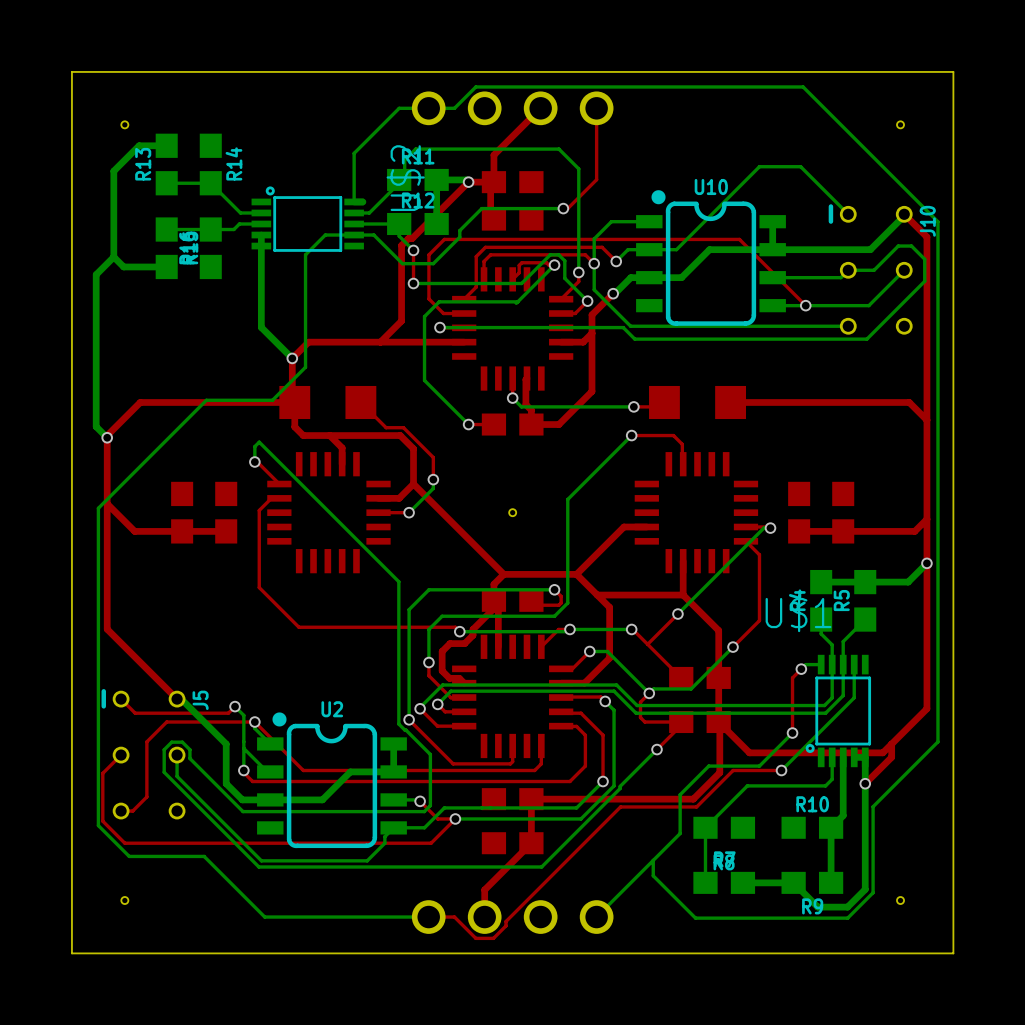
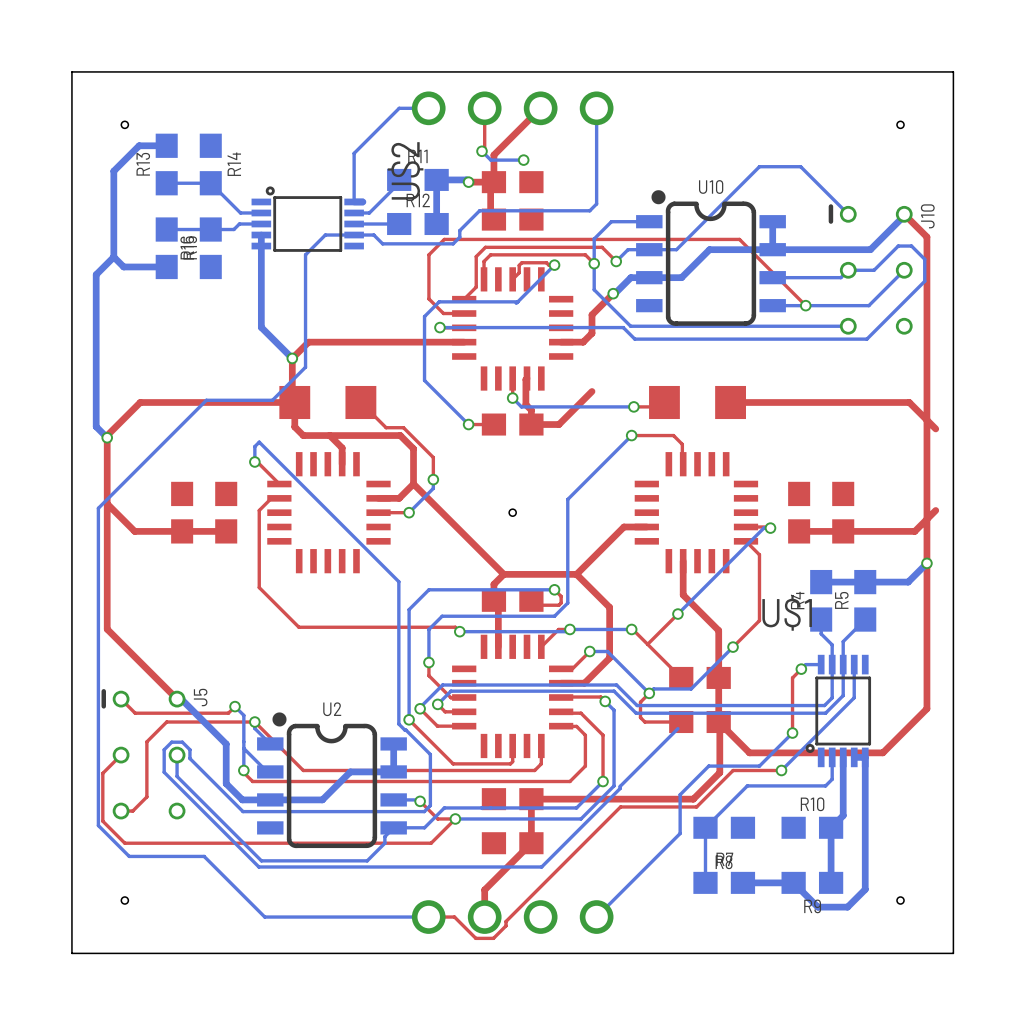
bottom track: (428, 108) (454, 108) (475, 86) (803, 86) (937, 221) (937, 741) (873, 806) (873, 892) (847, 918) (695, 918) (653, 875) (653, 860) -> none
top track: none -> (484, 108) (484, 148) (482, 151)
top track: (596, 108) (596, 179) (567, 208) (563, 208) -> none
bottom track: none -> (482, 151) (490, 160) (523, 160)
via: none -> (482, 151)
via: none -> (523, 160)
bottom track: (399, 179) (404, 174) (404, 160) (415, 149) (558, 149) (578, 168) (578, 272) -> none
top track: (468, 182) (412, 238) (408, 238) (401, 245) (401, 321) (380, 342) -> none
bottom track: (563, 208) (481, 208) (479, 210) -> (596, 108) (596, 203) (589, 210) (479, 210)
via: (563, 208) -> none
bottom track: (399, 224) (399, 236) (413, 250) -> none
bottom track: (453, 243) (433, 263) (402, 263) (382, 243) -> (453, 243) (382, 243)
top track: (413, 250) (413, 283) -> none
via: (413, 250) -> none
top track: (578, 272) (578, 281) (561, 299) -> none
via: (578, 272) -> none
bottom track: (413, 283) (521, 283) (550, 254) (558, 254) (564, 260) (564, 278) (587, 301) -> none
via: (413, 283) -> none
top track: (587, 301) (575, 313) (561, 313) -> none
via: (587, 301) -> none
top track: (592, 333) (592, 391) -> none
top track: none -> (926, 420) (935, 428)
top track: none -> (935, 510) (926, 519)
top track: (683, 595) (597, 595) -> none
top track: (498, 609) (492, 609) (473, 629) (473, 635) (464, 643) (450, 643) (442, 651) (442, 670) (449, 678) (459, 678) (464, 683) -> none
top track: (681, 722) (681, 725) (657, 749) -> none
bottom track: none -> (677, 728) (657, 749)
top track: (891, 744) (891, 757) (865, 783) -> none
via: (657, 749) -> none
via: (865, 783) -> none

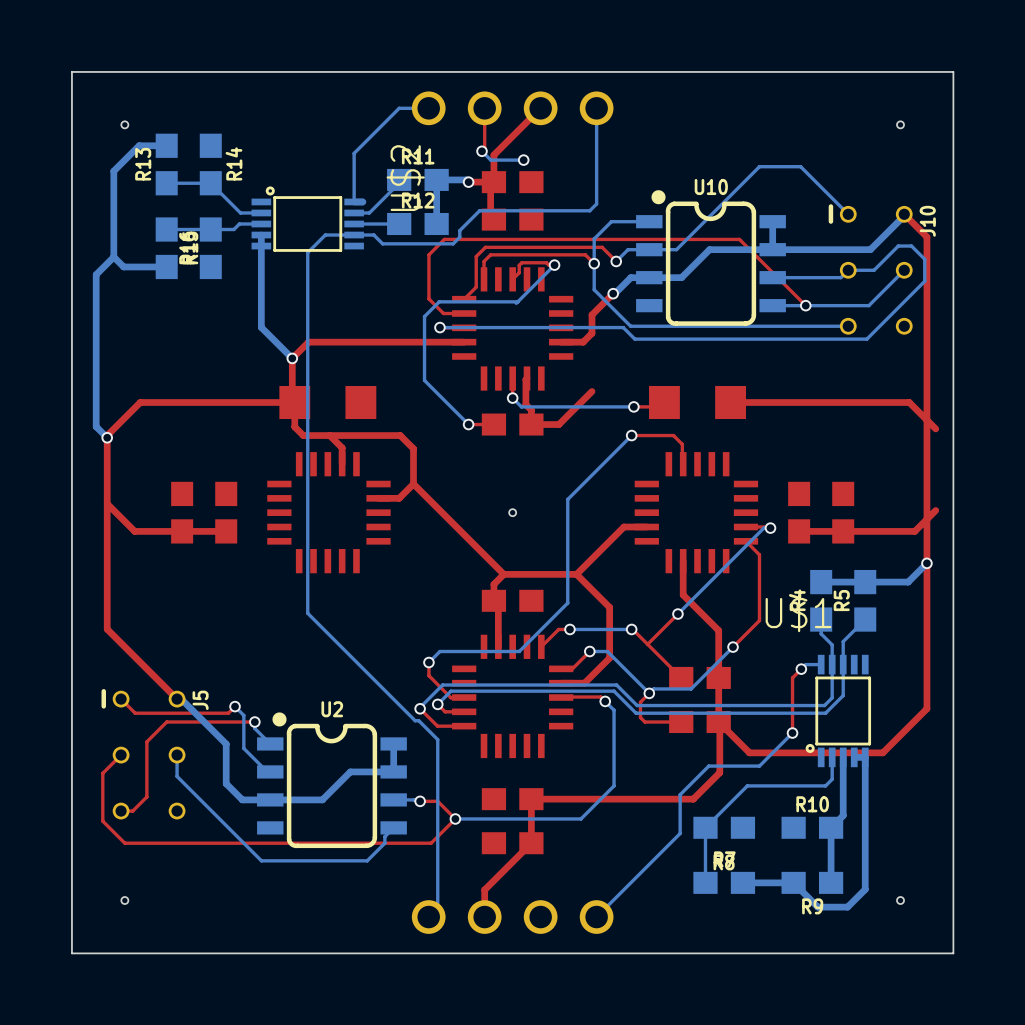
bottom track: (307, 252) (305, 254) (305, 367) (272, 400) (206, 400) (98, 508) (98, 825) (129, 856) (204, 856) (264, 917) (428, 917) -> (307, 252) (307, 613) (415, 720) (418, 720) (437, 739) (437, 908) (431, 914)
top track: (360, 402) (386, 427) (403, 427) (433, 457) (433, 479) -> none
top track: (254, 461) (257, 461) (279, 484) -> none
bottom track: (254, 461) (254, 446) (259, 442) (398, 581) (398, 724) (430, 754) (430, 805) (424, 811) (243, 811) (189, 758) (189, 749) (182, 742) (171, 742) (164, 749) (164, 772) (258, 867) (541, 867) (677, 728) -> none
via: (254, 461) -> none
bottom track: (433, 479) (433, 488) (409, 512) -> none
via: (433, 479) -> none
top track: (279, 498) (271, 498) (259, 510) (259, 587) (298, 627) (455, 627) (459, 631) -> none
top track: (409, 512) (378, 512) -> none
via: (409, 512) -> none
top track: (554, 589) (561, 596) (561, 603) (558, 605) (535, 605) (531, 600) -> none
bottom track: (554, 589) (428, 589) (409, 609) (409, 719) -> none
via: (554, 589) -> none
bottom track: (554, 616) (442, 616) (428, 629) (428, 662) -> (554, 616) (519, 651) (439, 651) (428, 662)
bottom track: (569, 629) (567, 631) (459, 631) -> none
via: (459, 631) -> none
bottom track: (854, 664) (854, 697) (781, 770) -> none
top track: (561, 711) (580, 713) (603, 735) (603, 781) -> none
top track: (409, 719) (453, 763) (510, 763) (512, 761) (512, 745) -> none
via: (409, 719) -> none
top track: (254, 722) (303, 770) (534, 770) (541, 763) (541, 745) -> none
top track: (561, 726) (576, 726) (585, 735) (585, 766) (569, 781) (252, 781) (243, 770) -> none
bottom track: (243, 748) (243, 770) -> none
via: (243, 770) -> none
top track: (781, 770) (733, 770) (696, 806) (620, 806) (506, 921) (506, 925) (493, 938) (475, 938) (454, 917) (428, 917) -> none
via: (781, 770) -> none
bottom track: (603, 781) (576, 807) (444, 807) (424, 827) (398, 827) (395, 825) (393, 827) -> none
via: (603, 781) -> none
top track: (420, 801) (437, 818) (455, 818) -> (415, 801) (437, 801) (455, 818)

